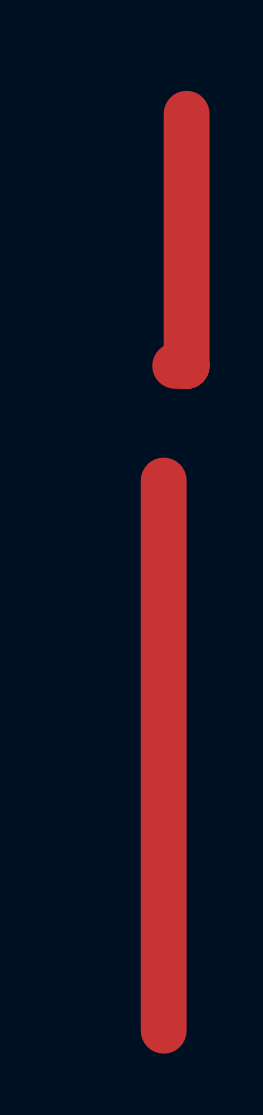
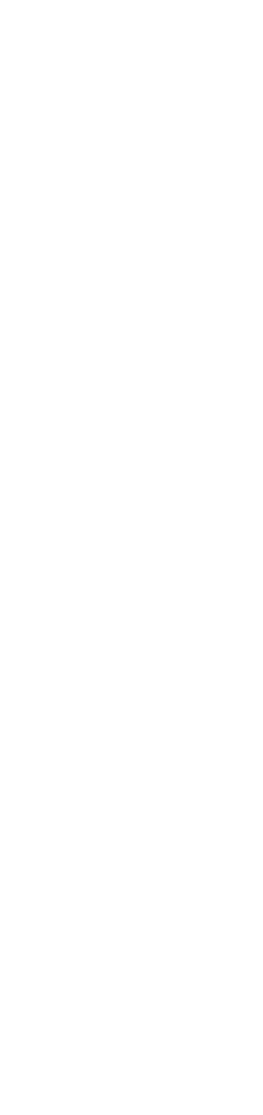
track: (186, 113) (186, 365) (175, 365) -> none
track: (163, 480) (163, 1030) -> none

